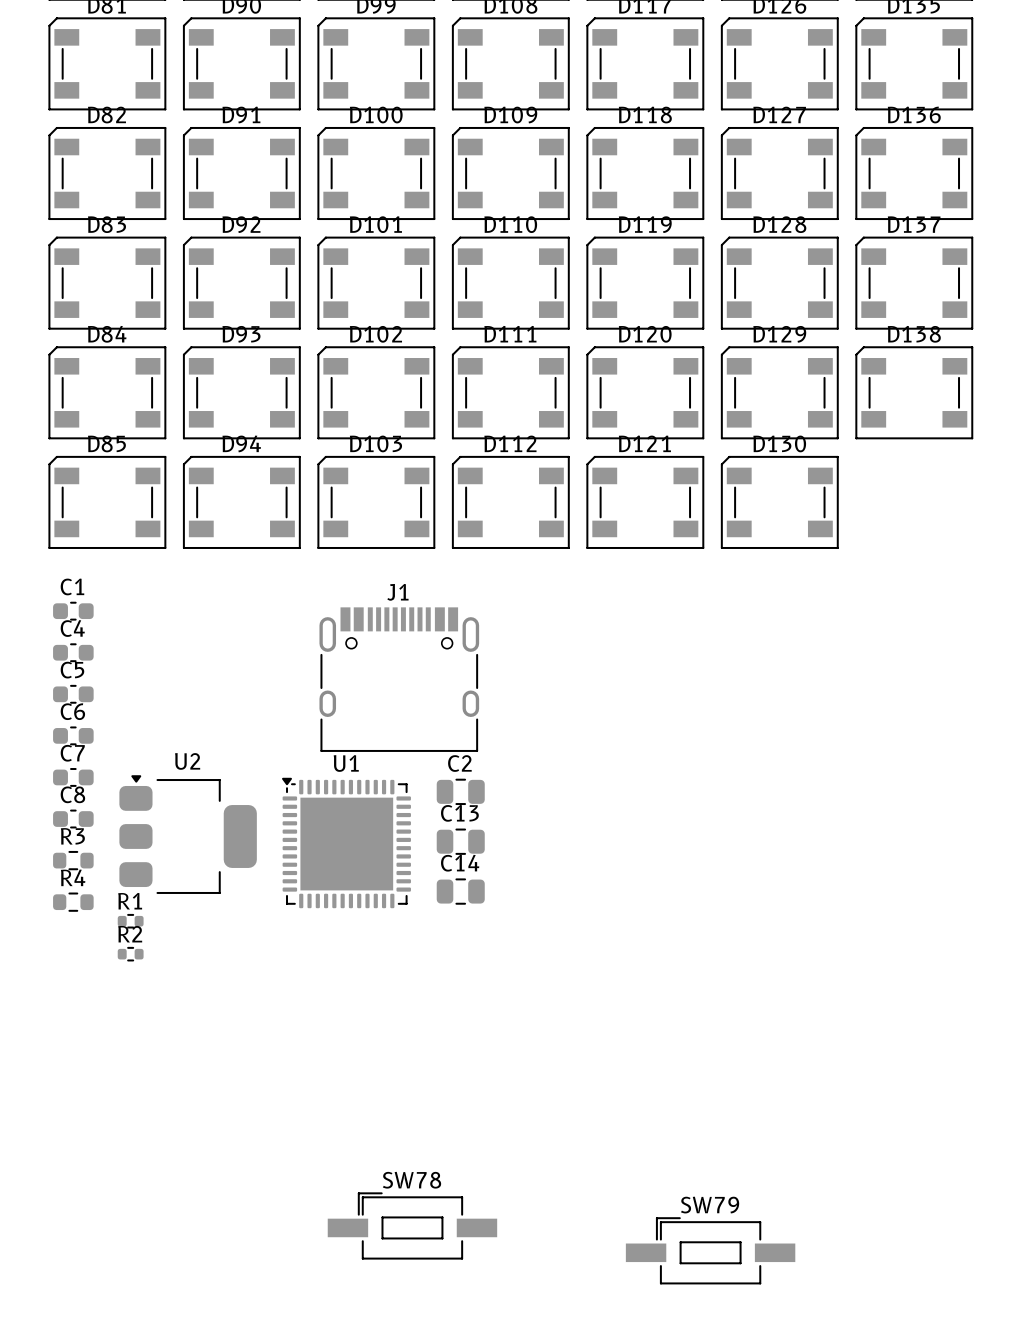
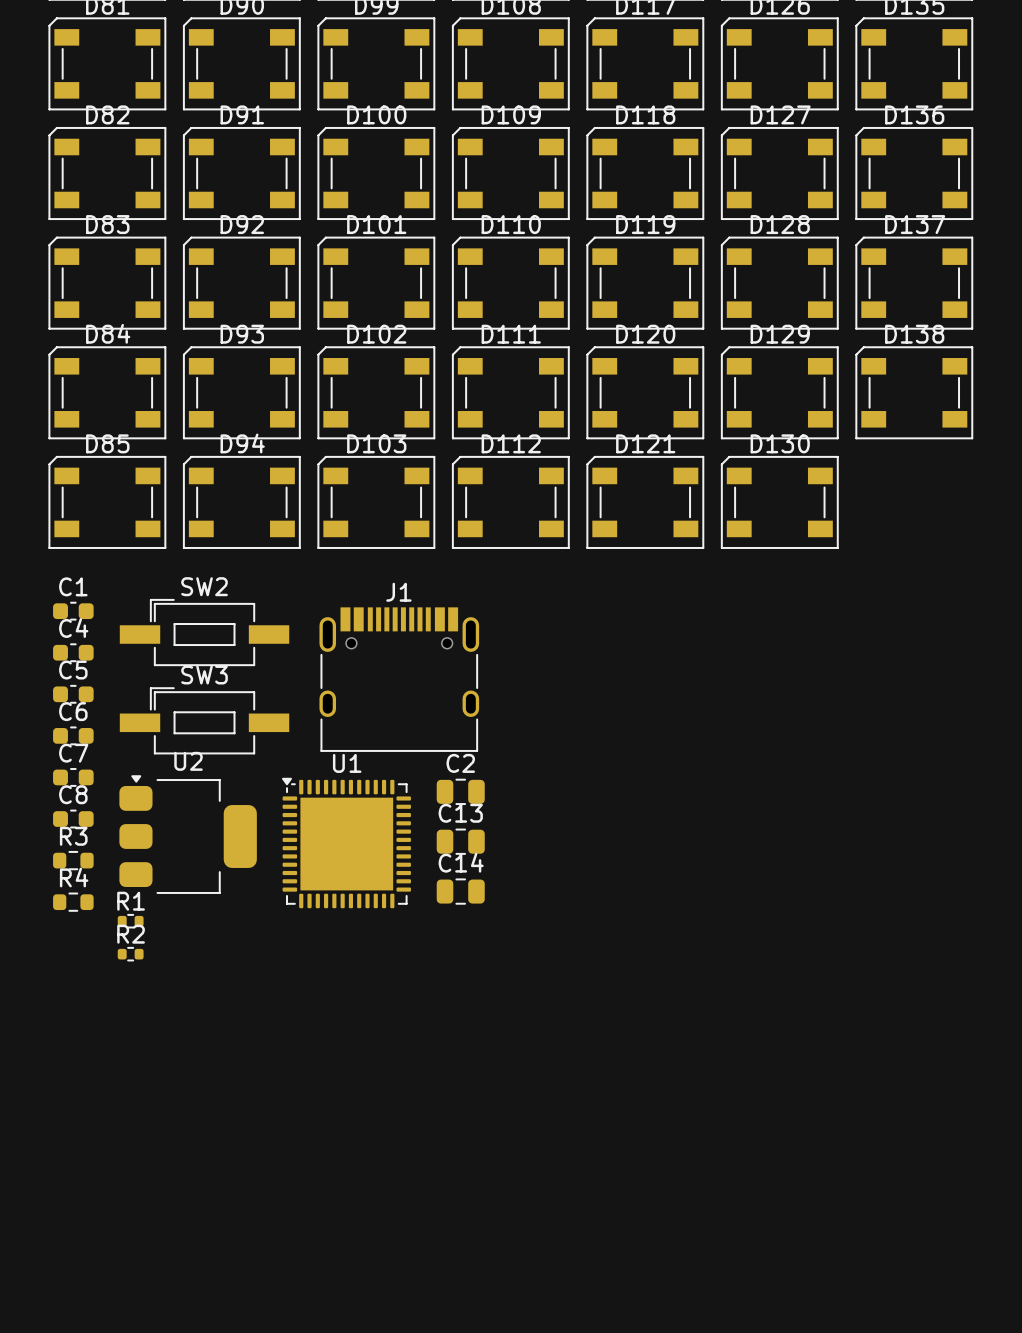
SW2: none -> (204, 632)
SW3: none -> (204, 720)
SW78: (412, 1225) -> none
SW79: (710, 1250) -> none

